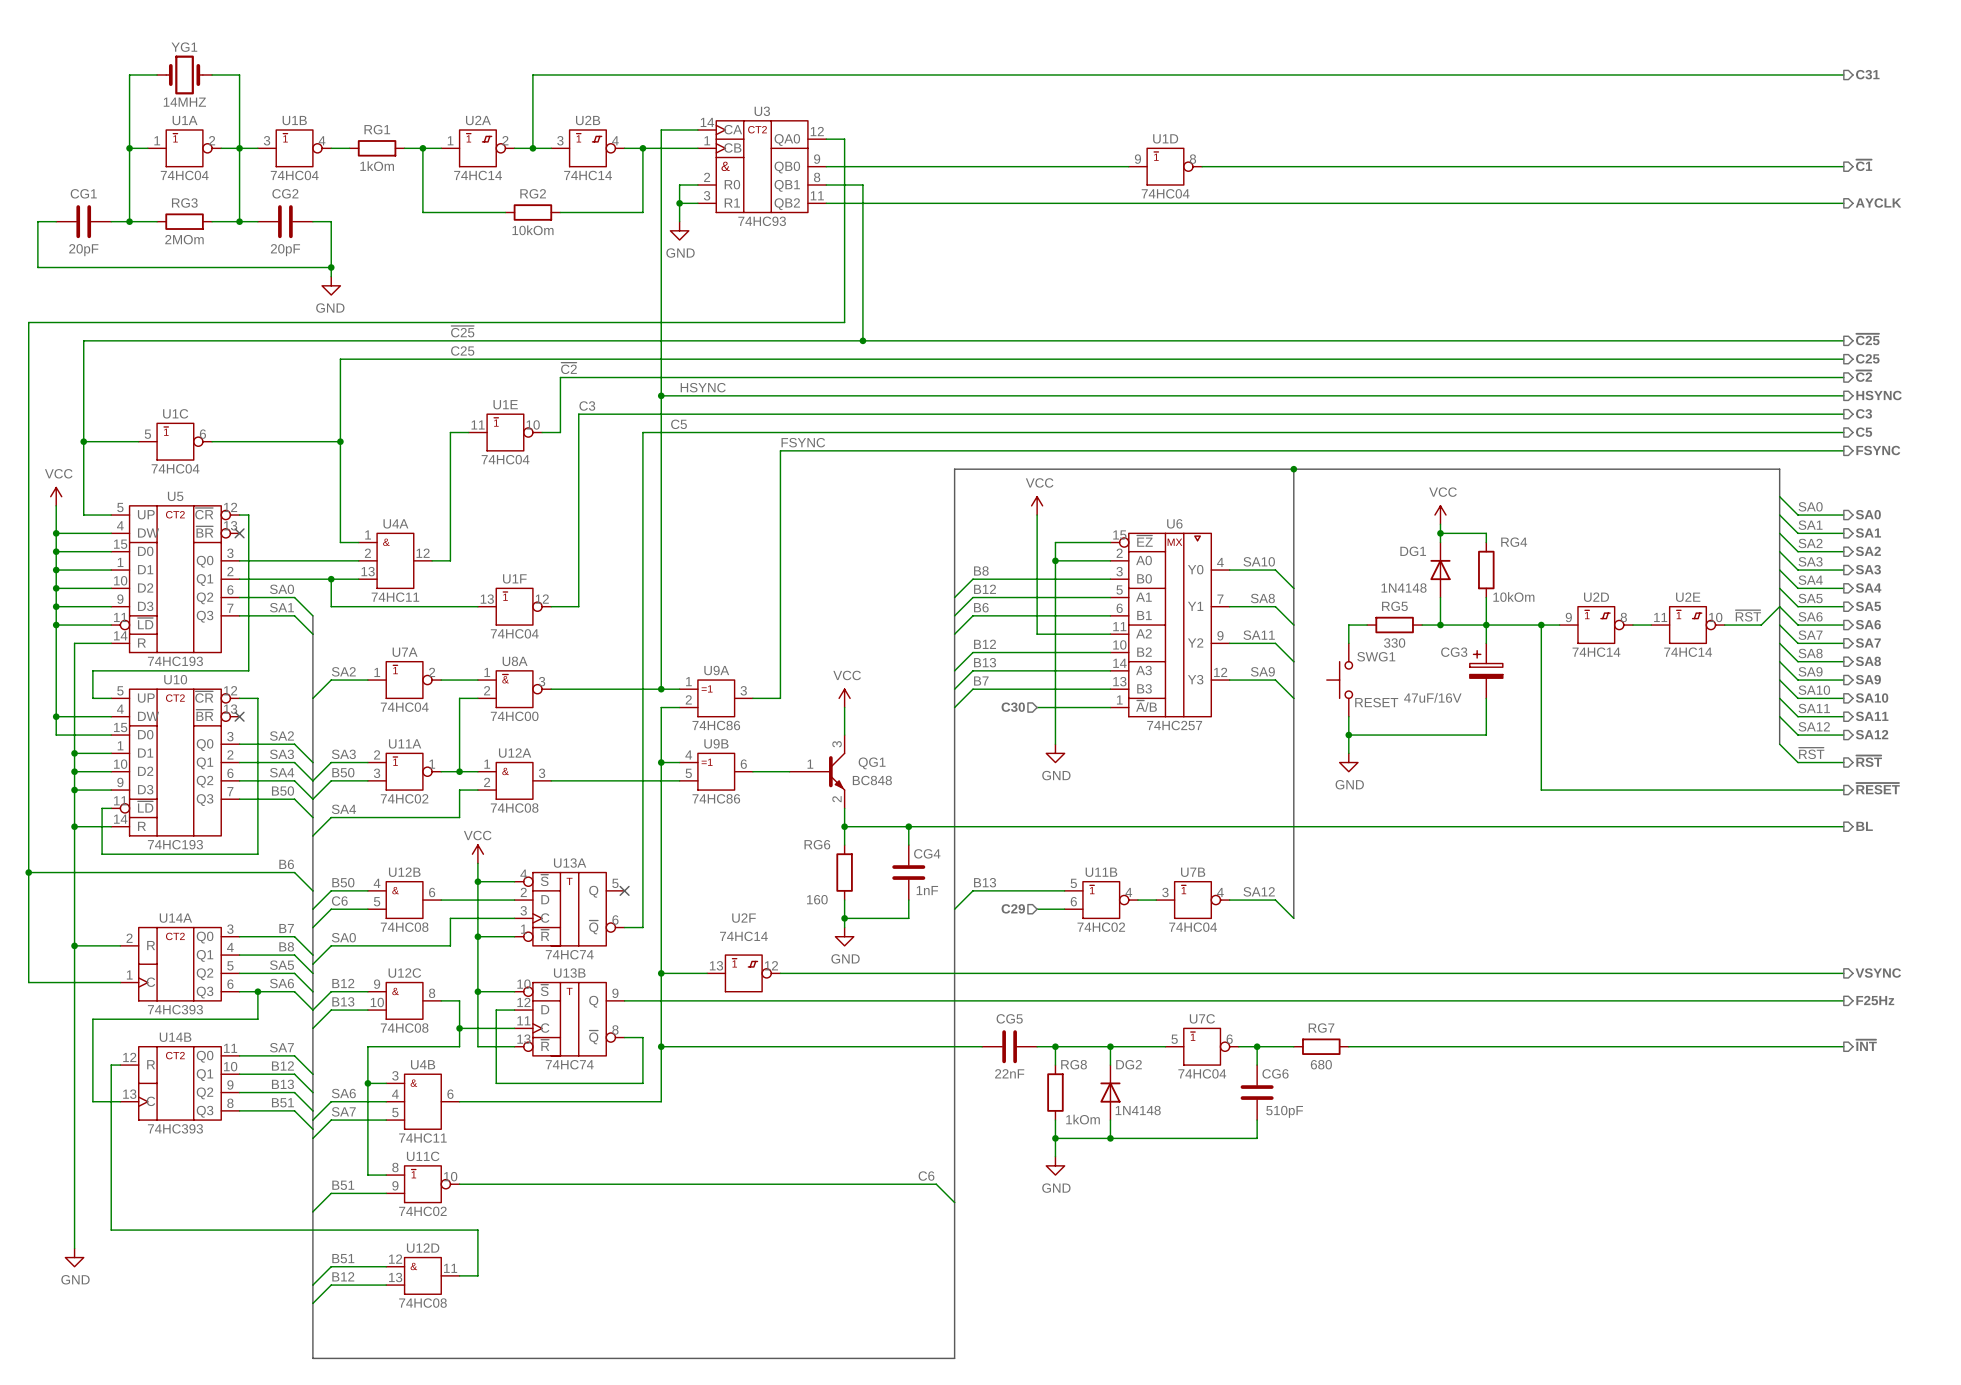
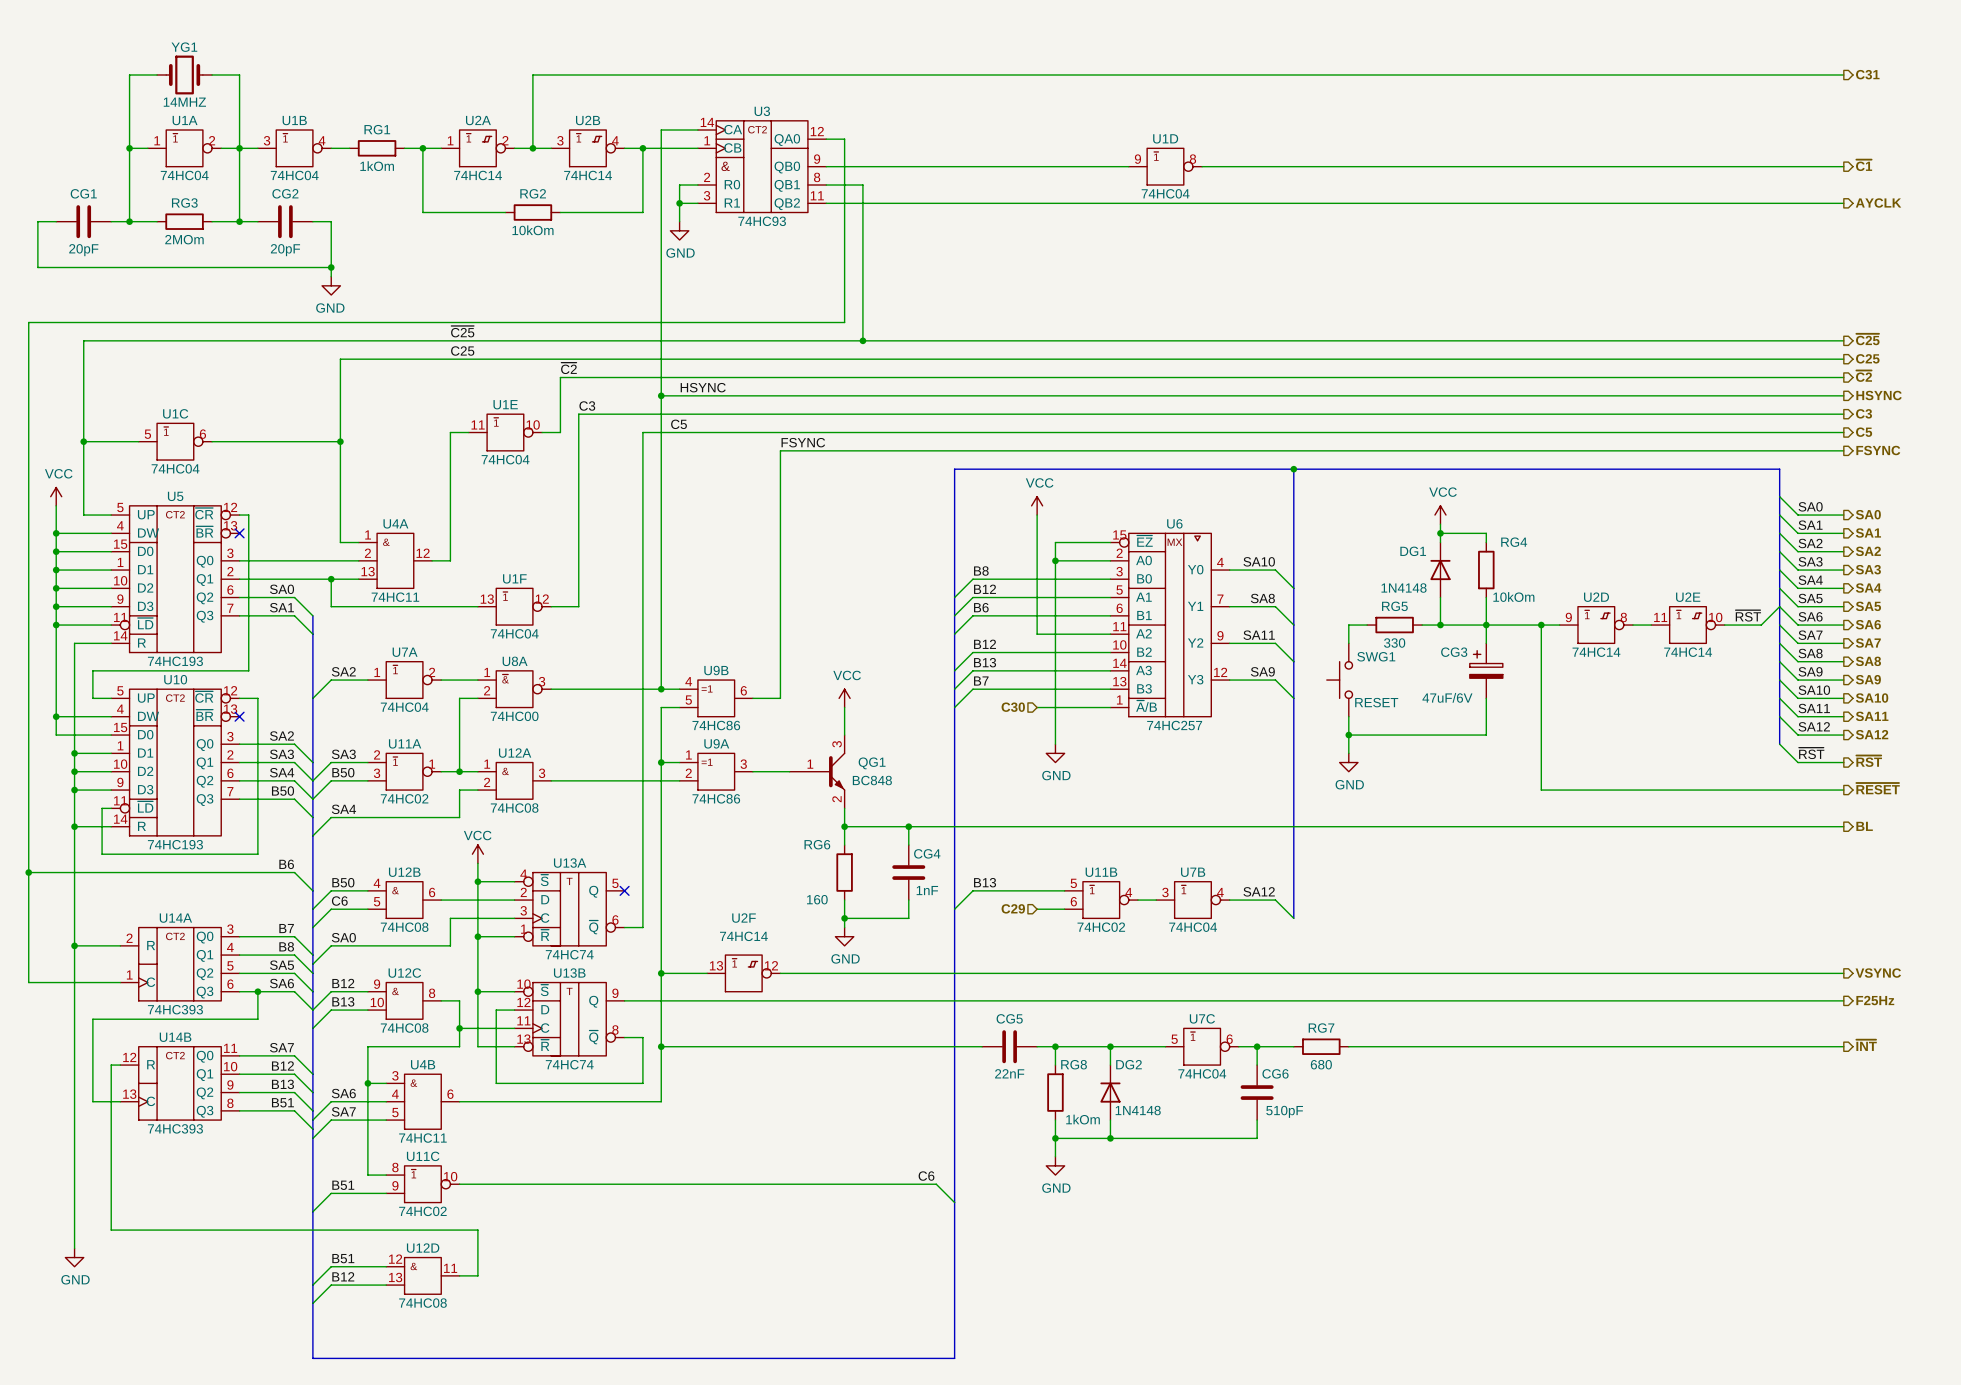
CG3 value: 47uF/16V (1432, 697) -> 47uF/6V (1447, 697)
U9A position: (716, 698) -> (716, 771)
U9B position: (716, 771) -> (716, 698)

